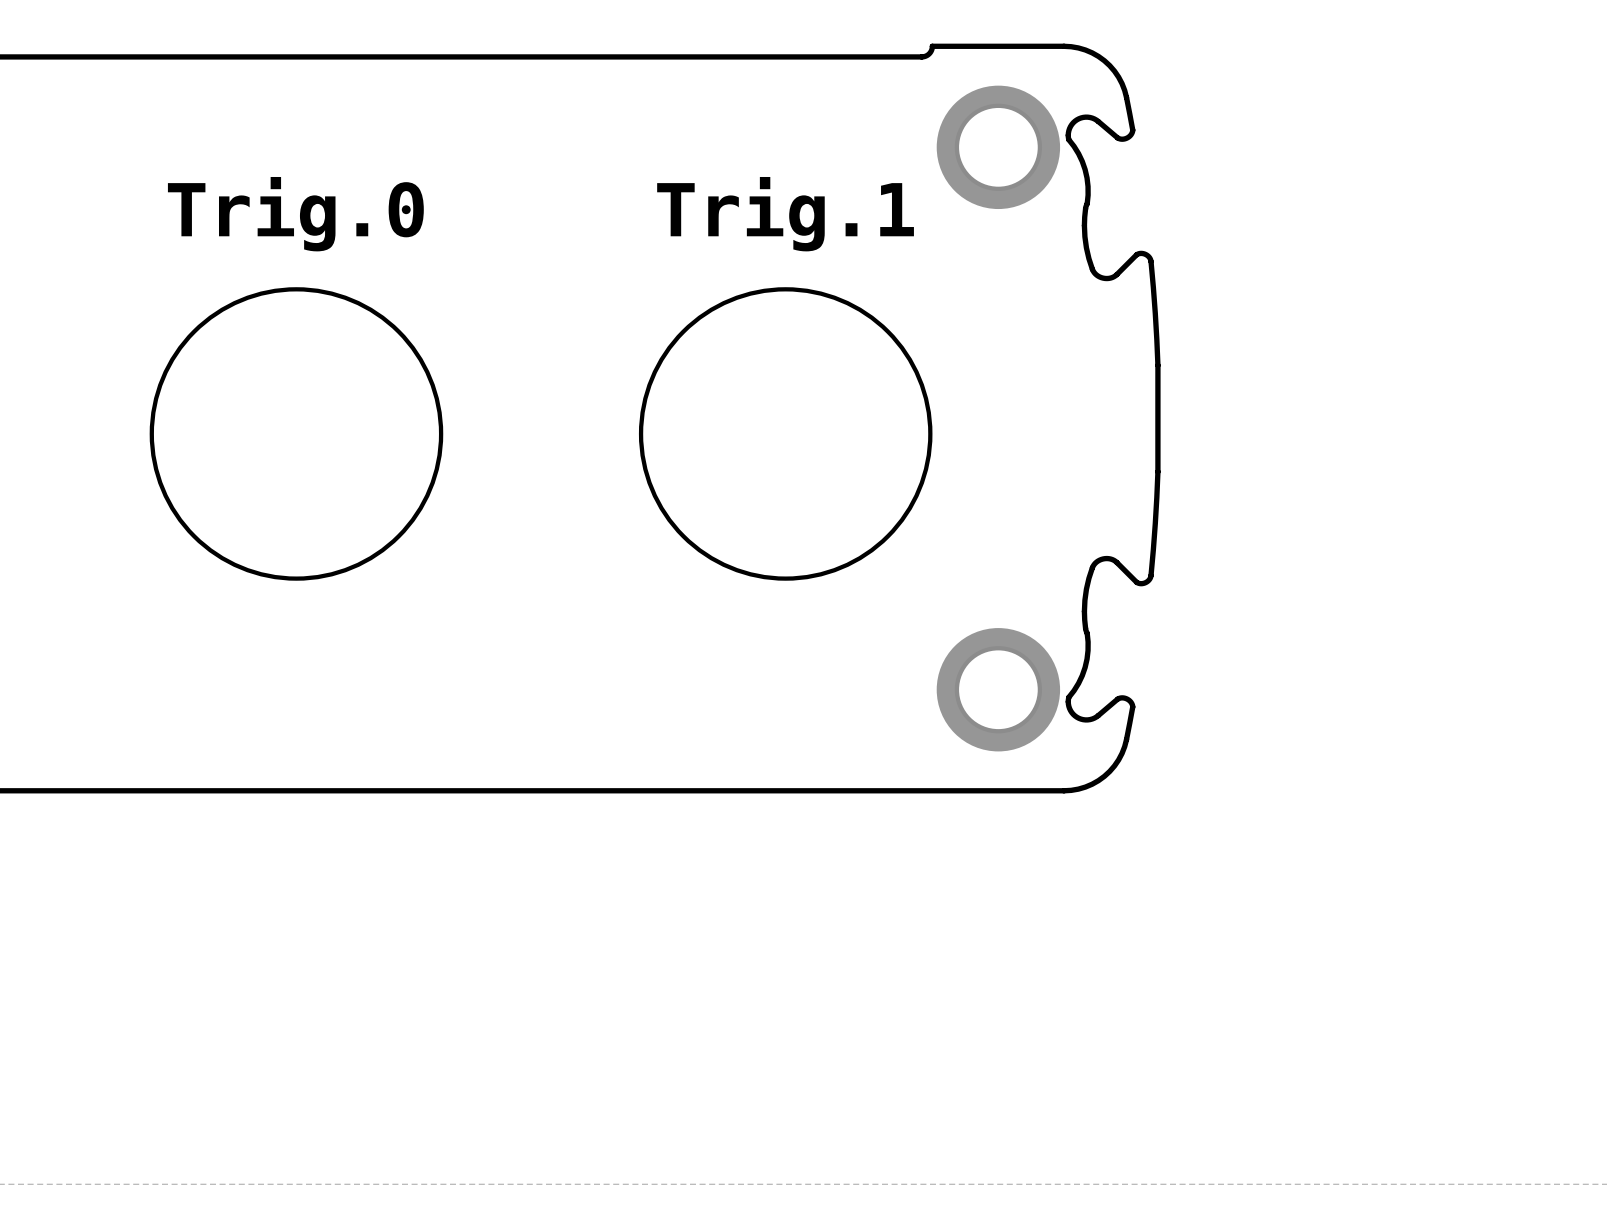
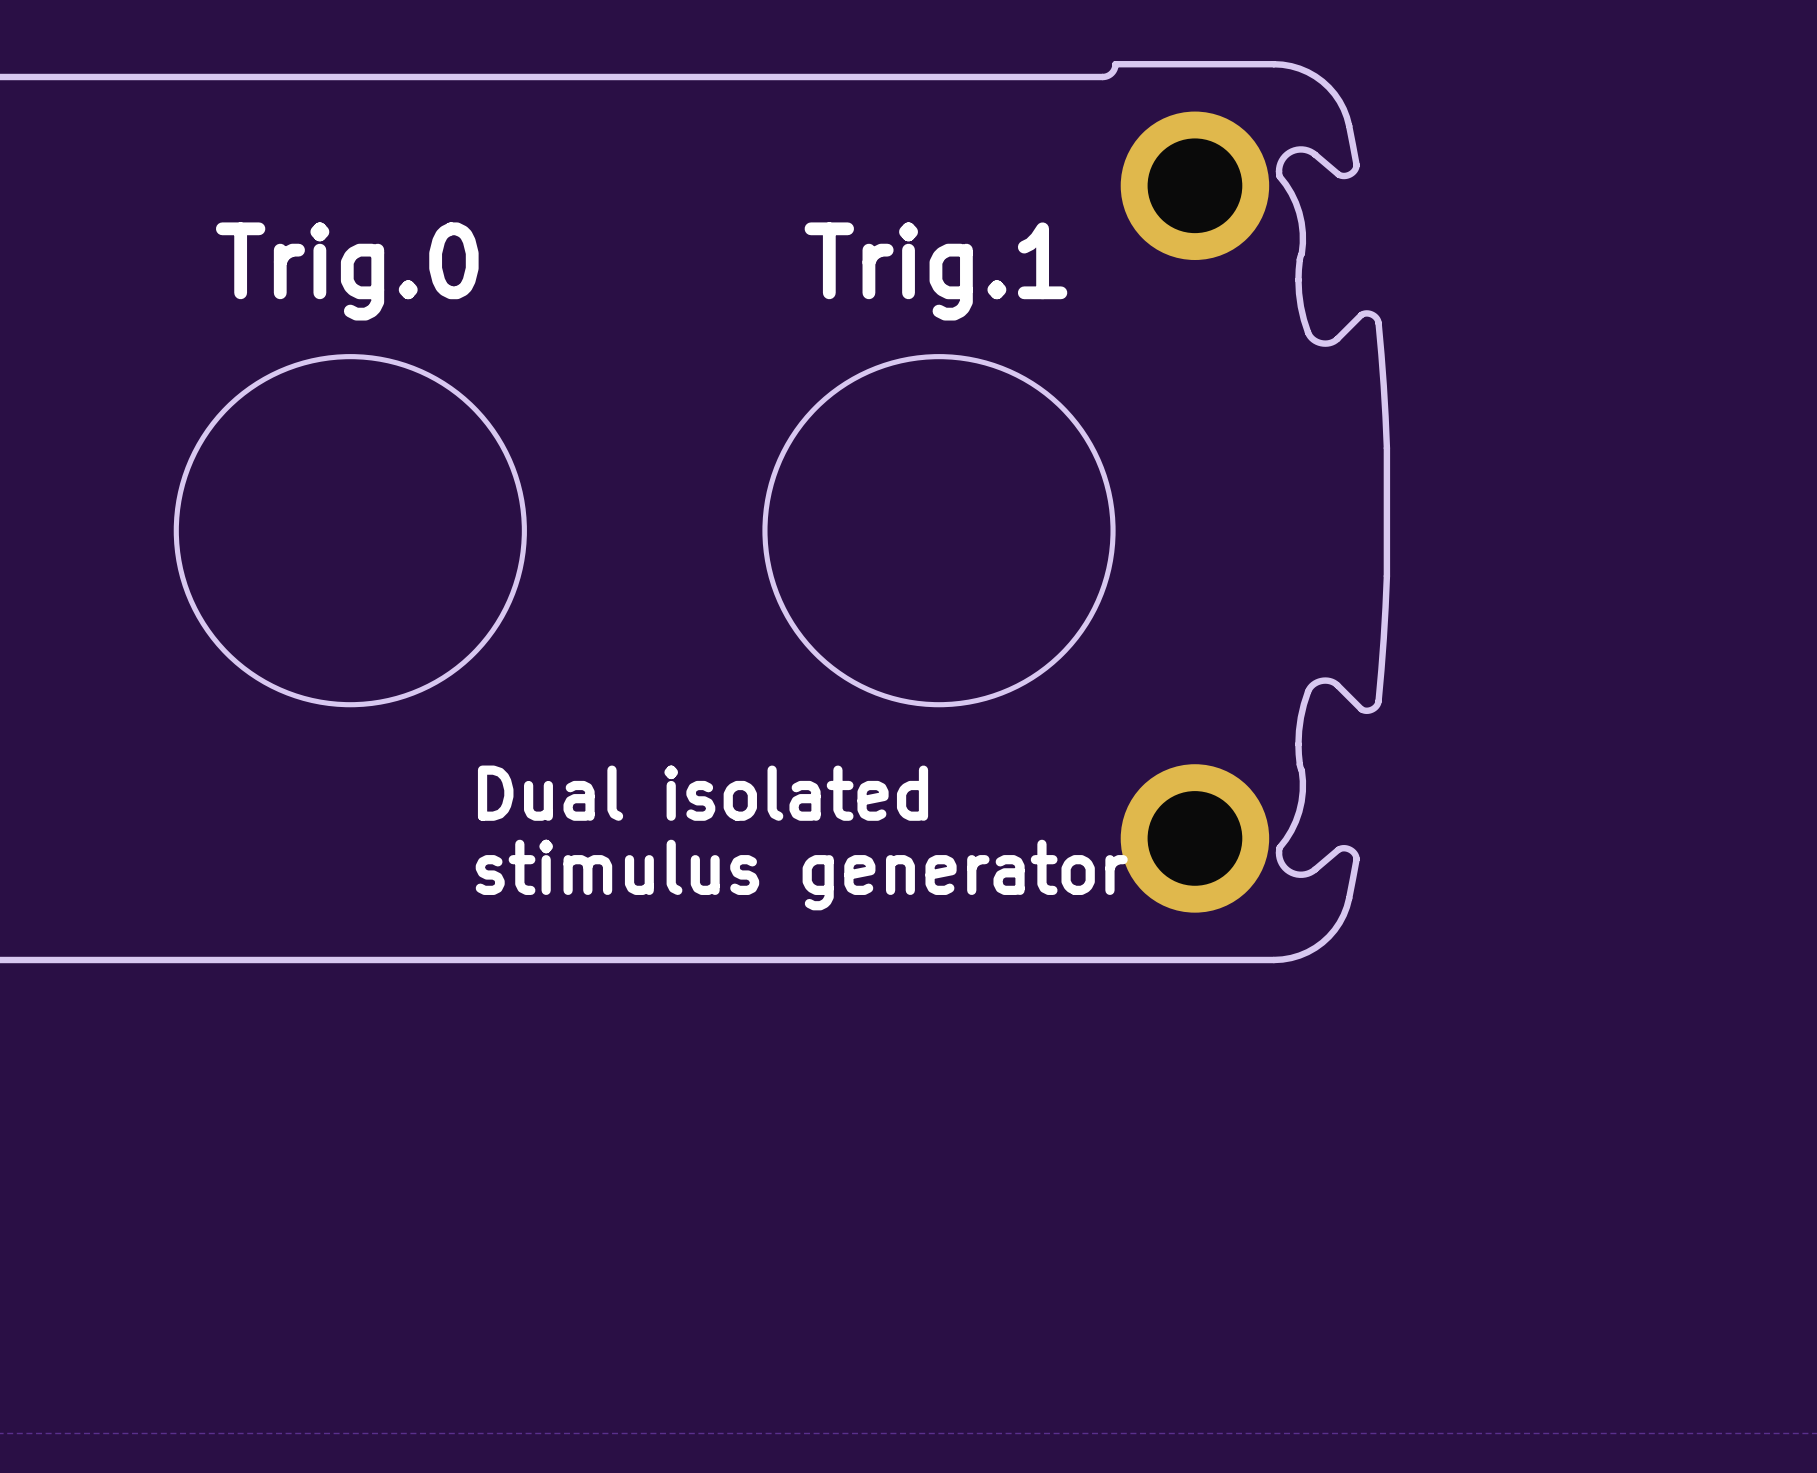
text: none -> Dual isolated (703, 793)
text: none -> stimulus generator (801, 875)

